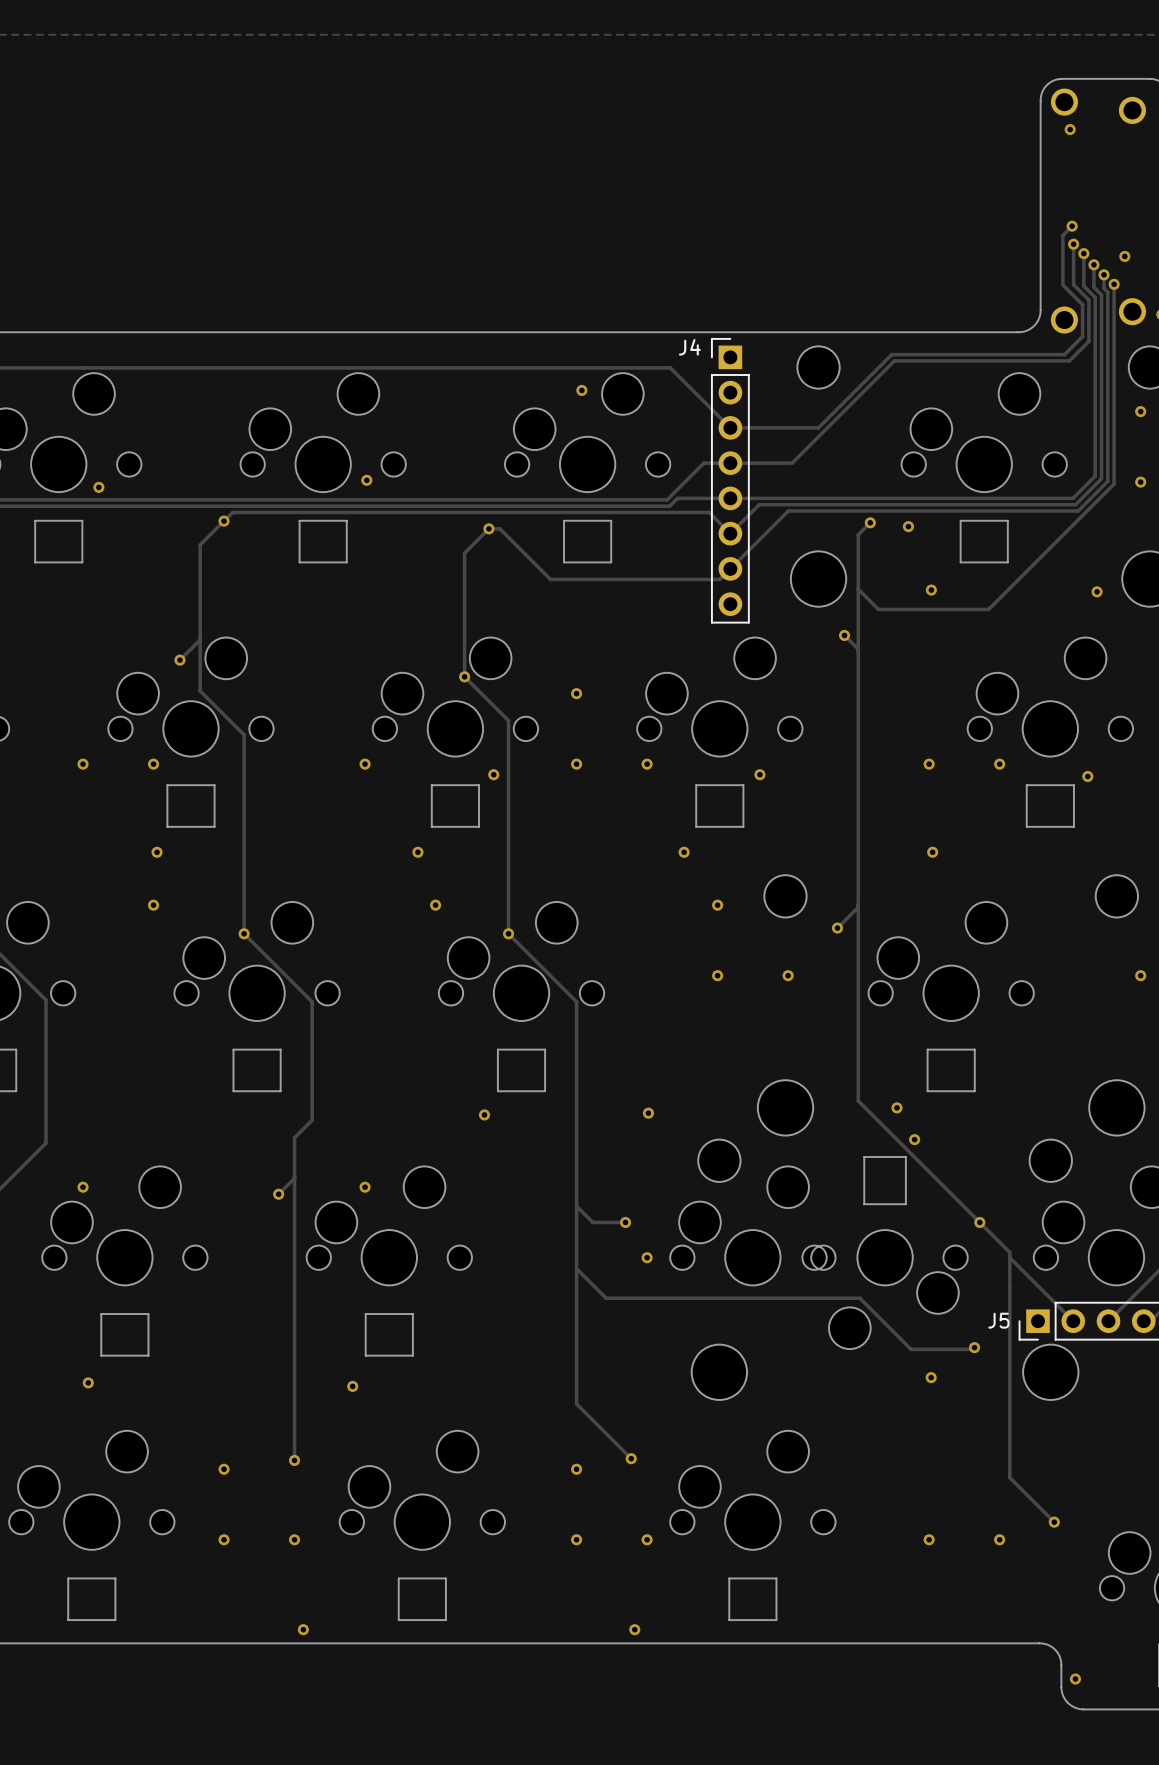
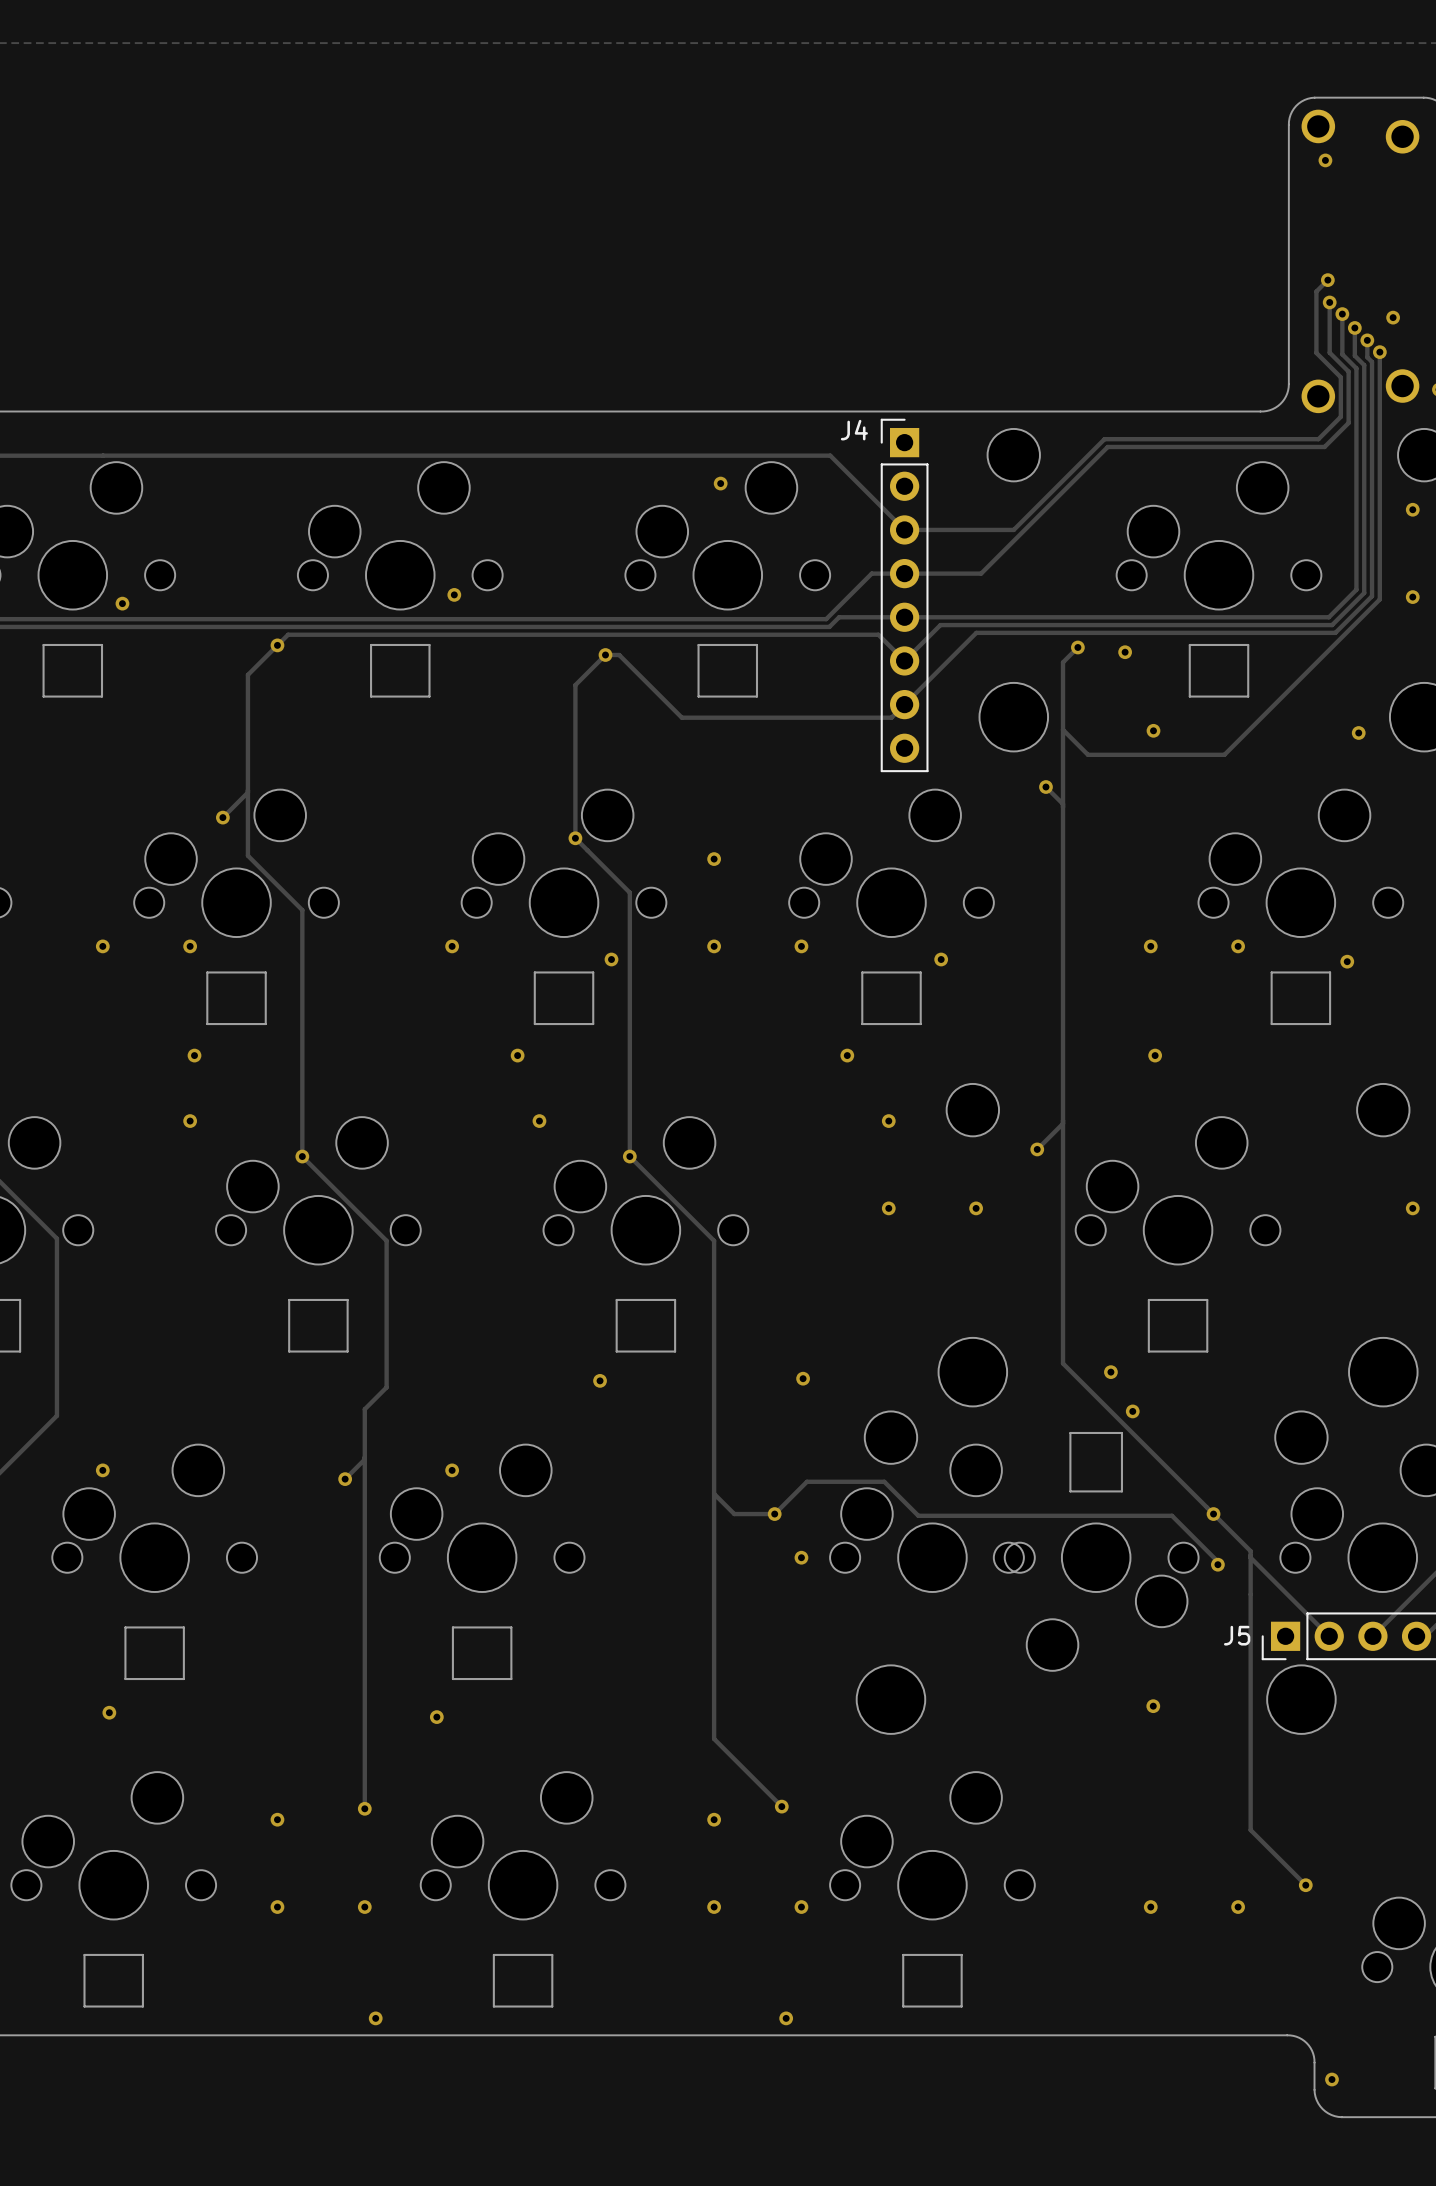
track: none -> (774, 1514) (806, 1481) (884, 1481) (918, 1515) (1172, 1515) (1217, 1561) (1217, 1564)
via: none -> (1217, 1564)
track: (576, 1268) (606, 1298) (859, 1298) (911, 1349) (972, 1349) (974, 1347) -> none
via: (974, 1347) -> none

